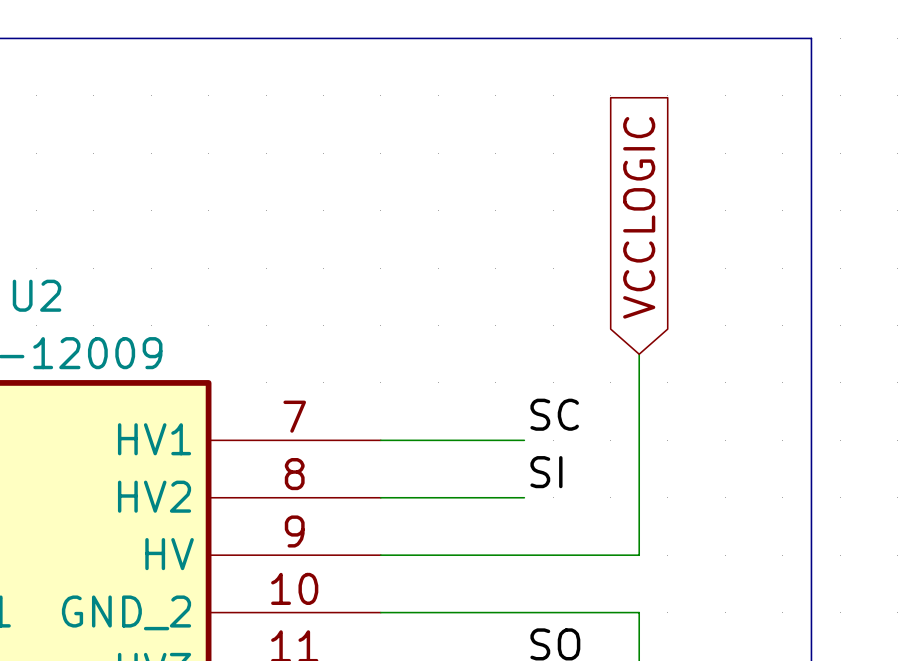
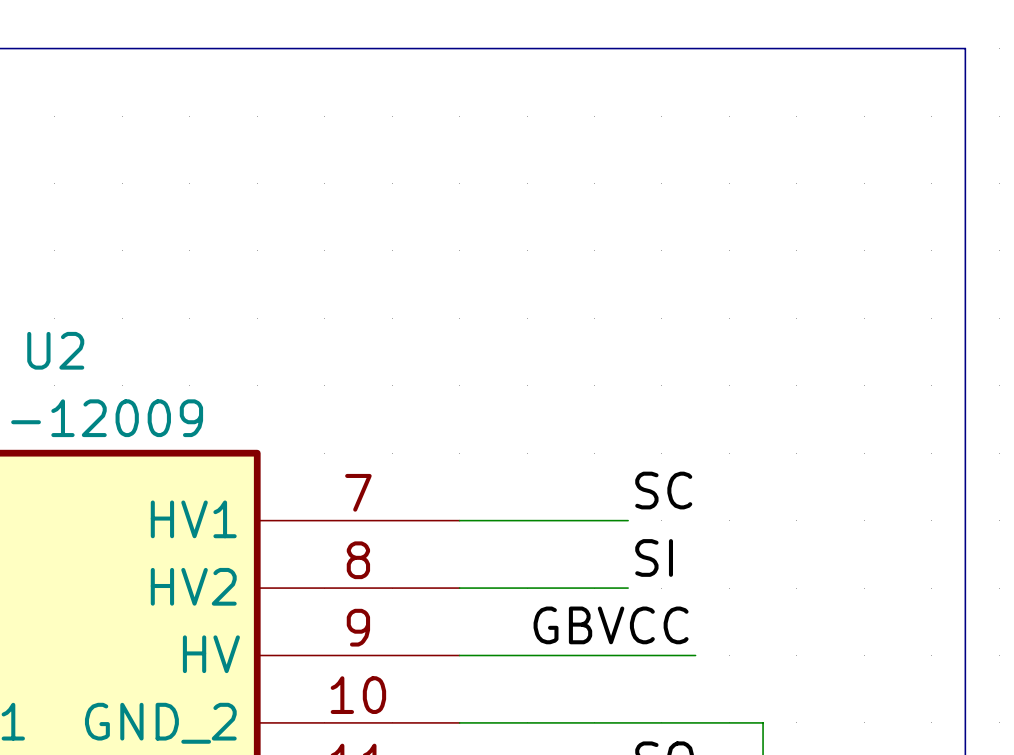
global label: VCCLOGIC (639, 217) -> none
wire: (639, 354) (639, 555) (581, 555) -> none
label: none -> GBVCC (611, 625)

